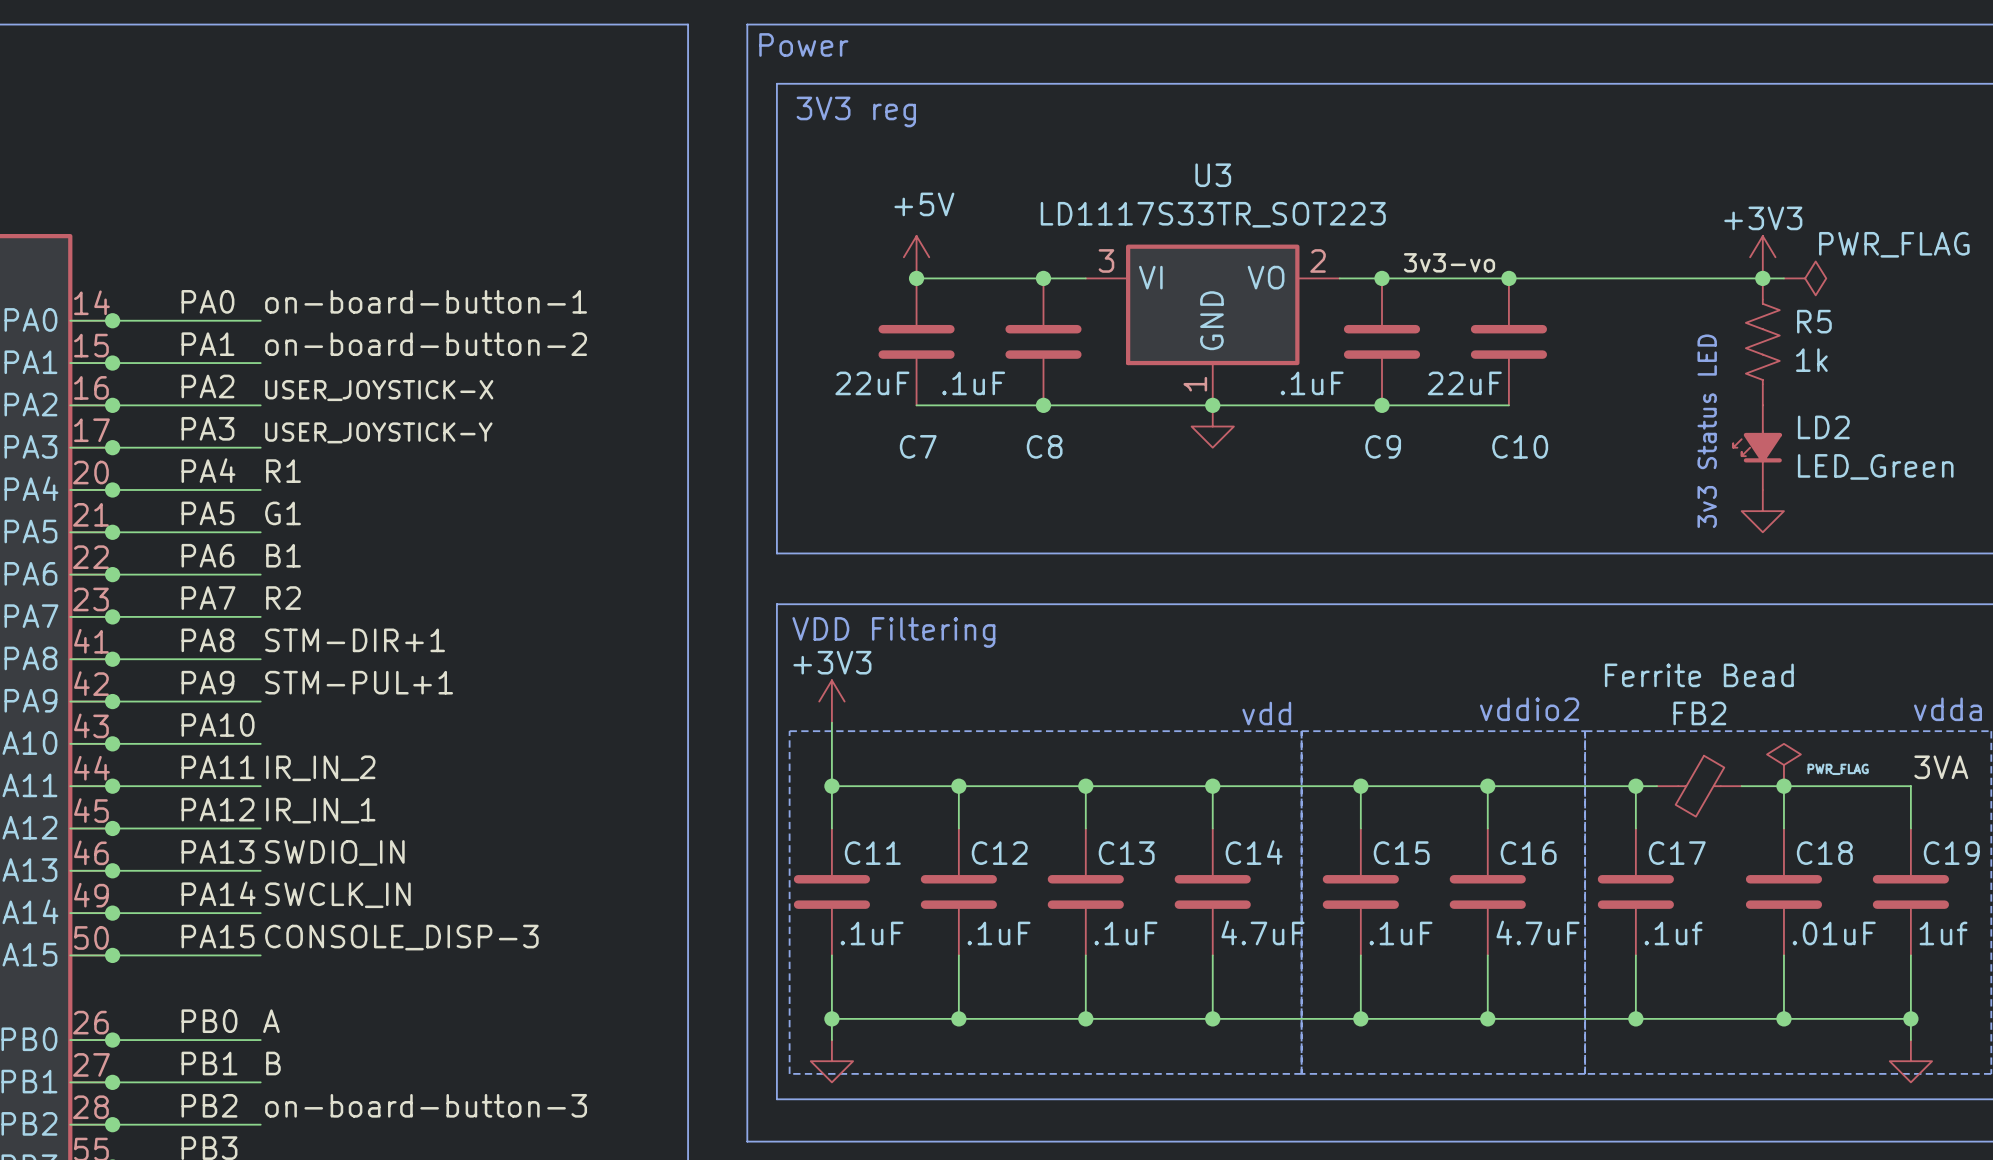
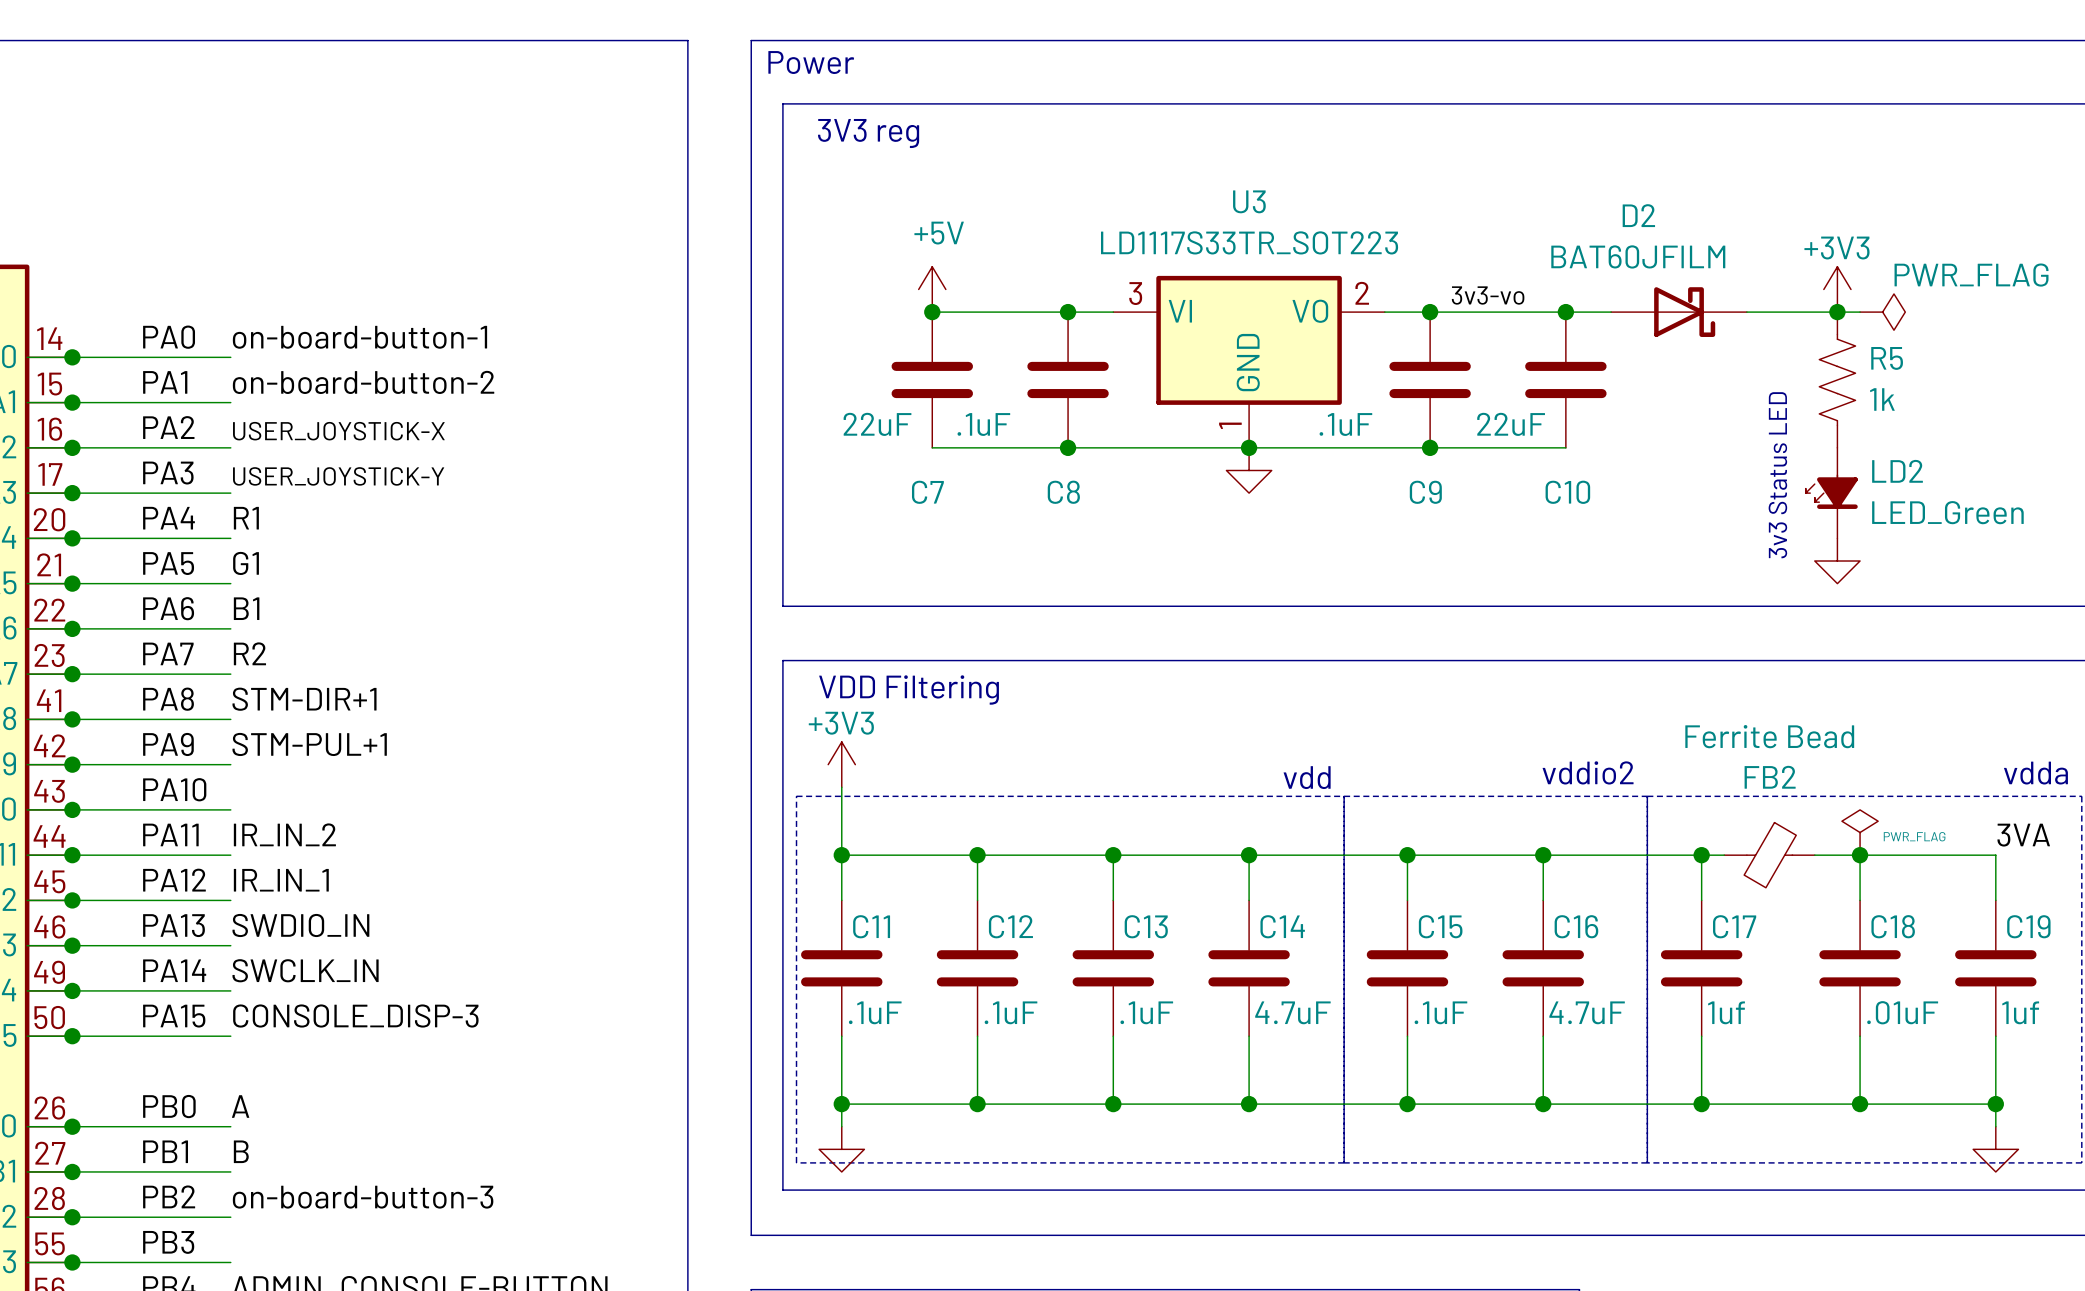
D2: none -> BAT60JFILM (1679, 312)
C17 value: .1uf (1673, 933) -> 1uf (1726, 1012)

